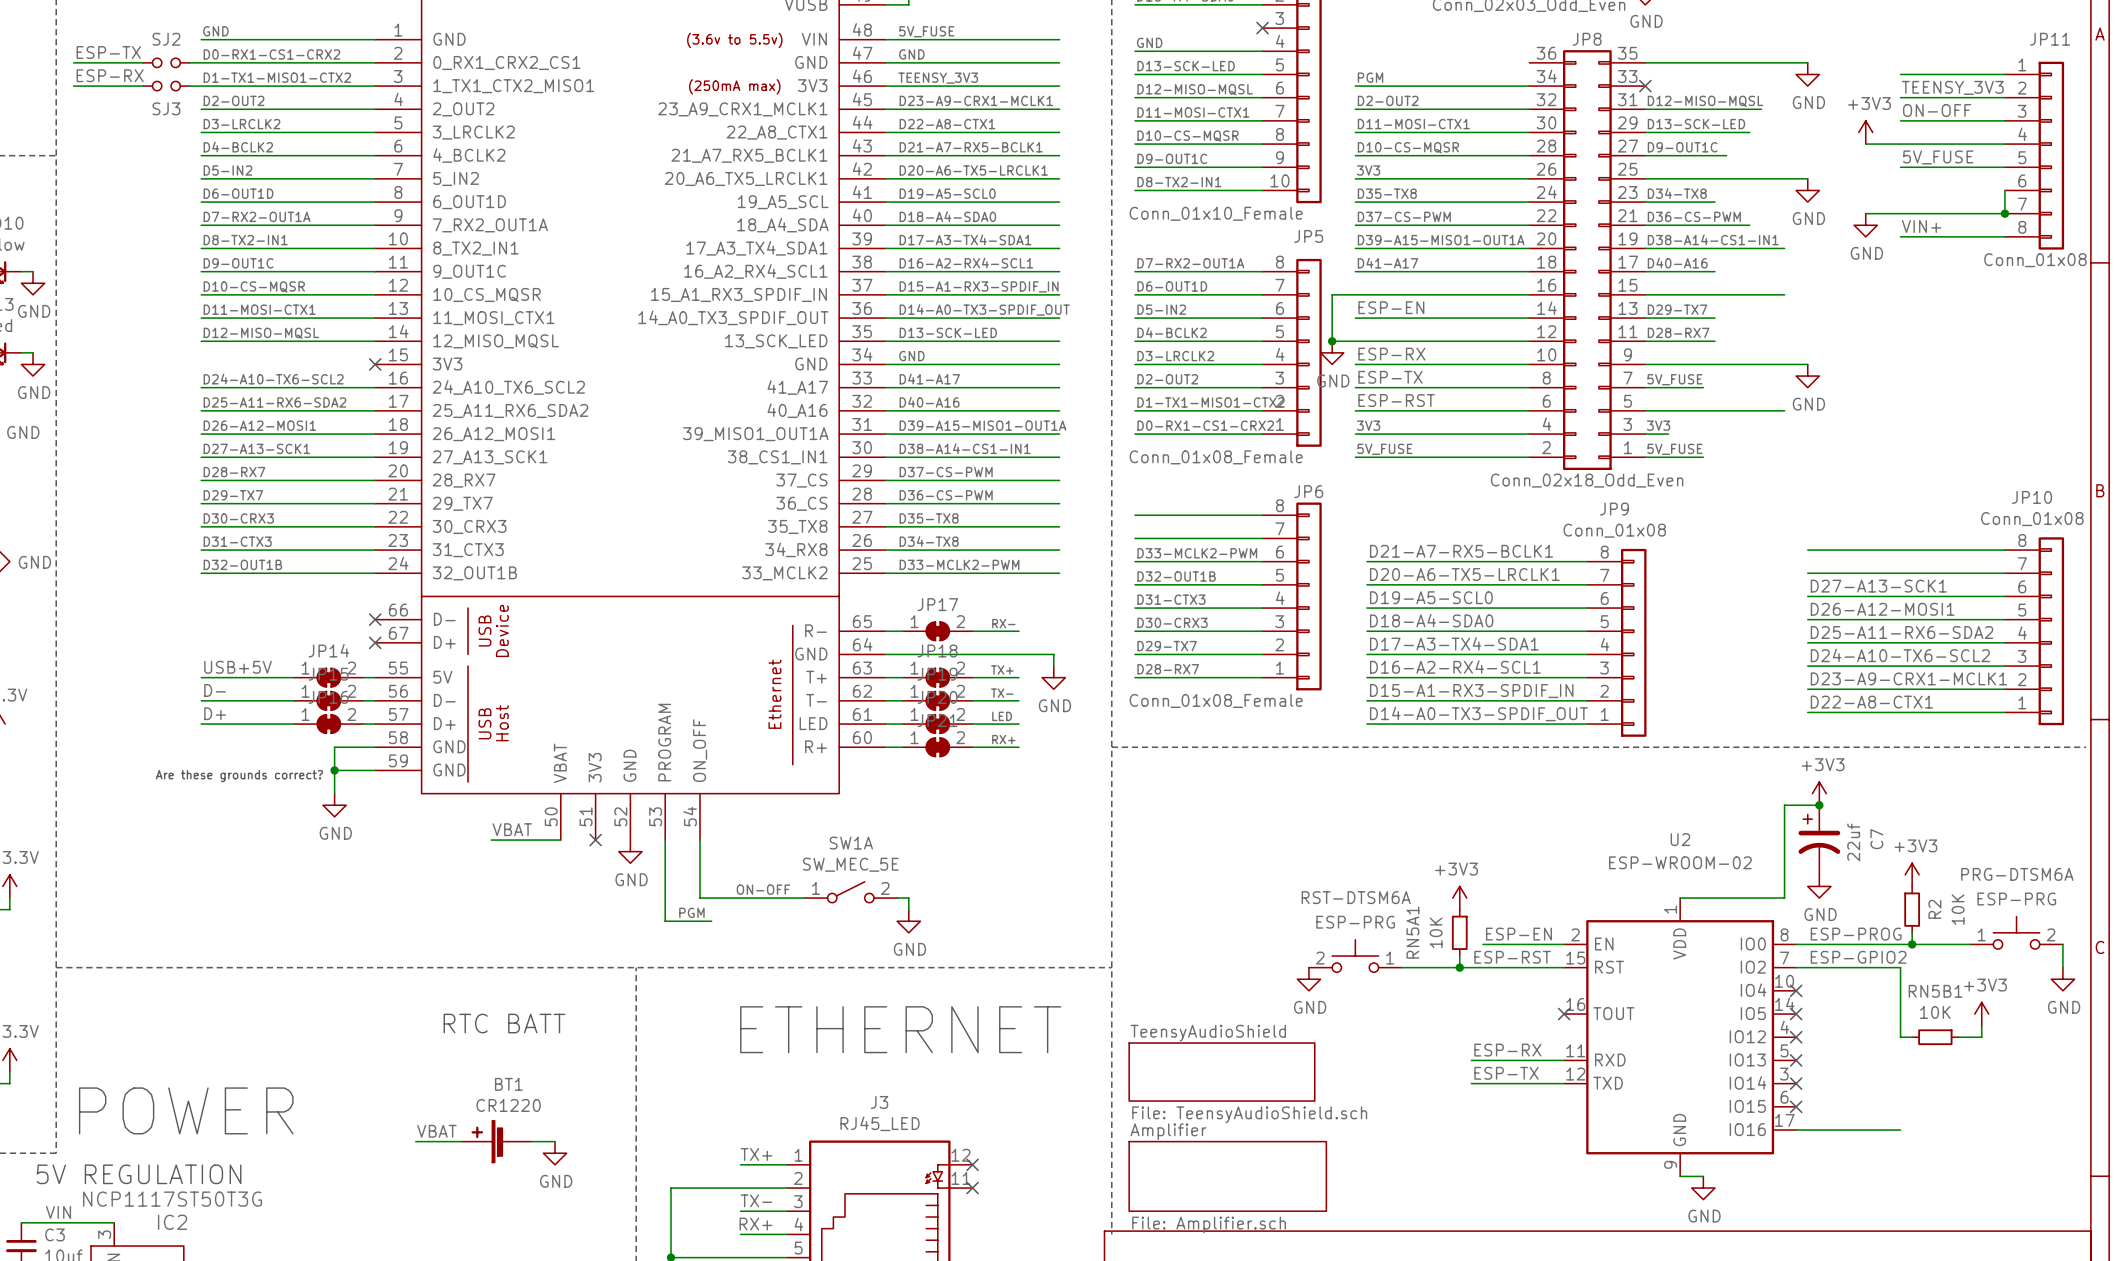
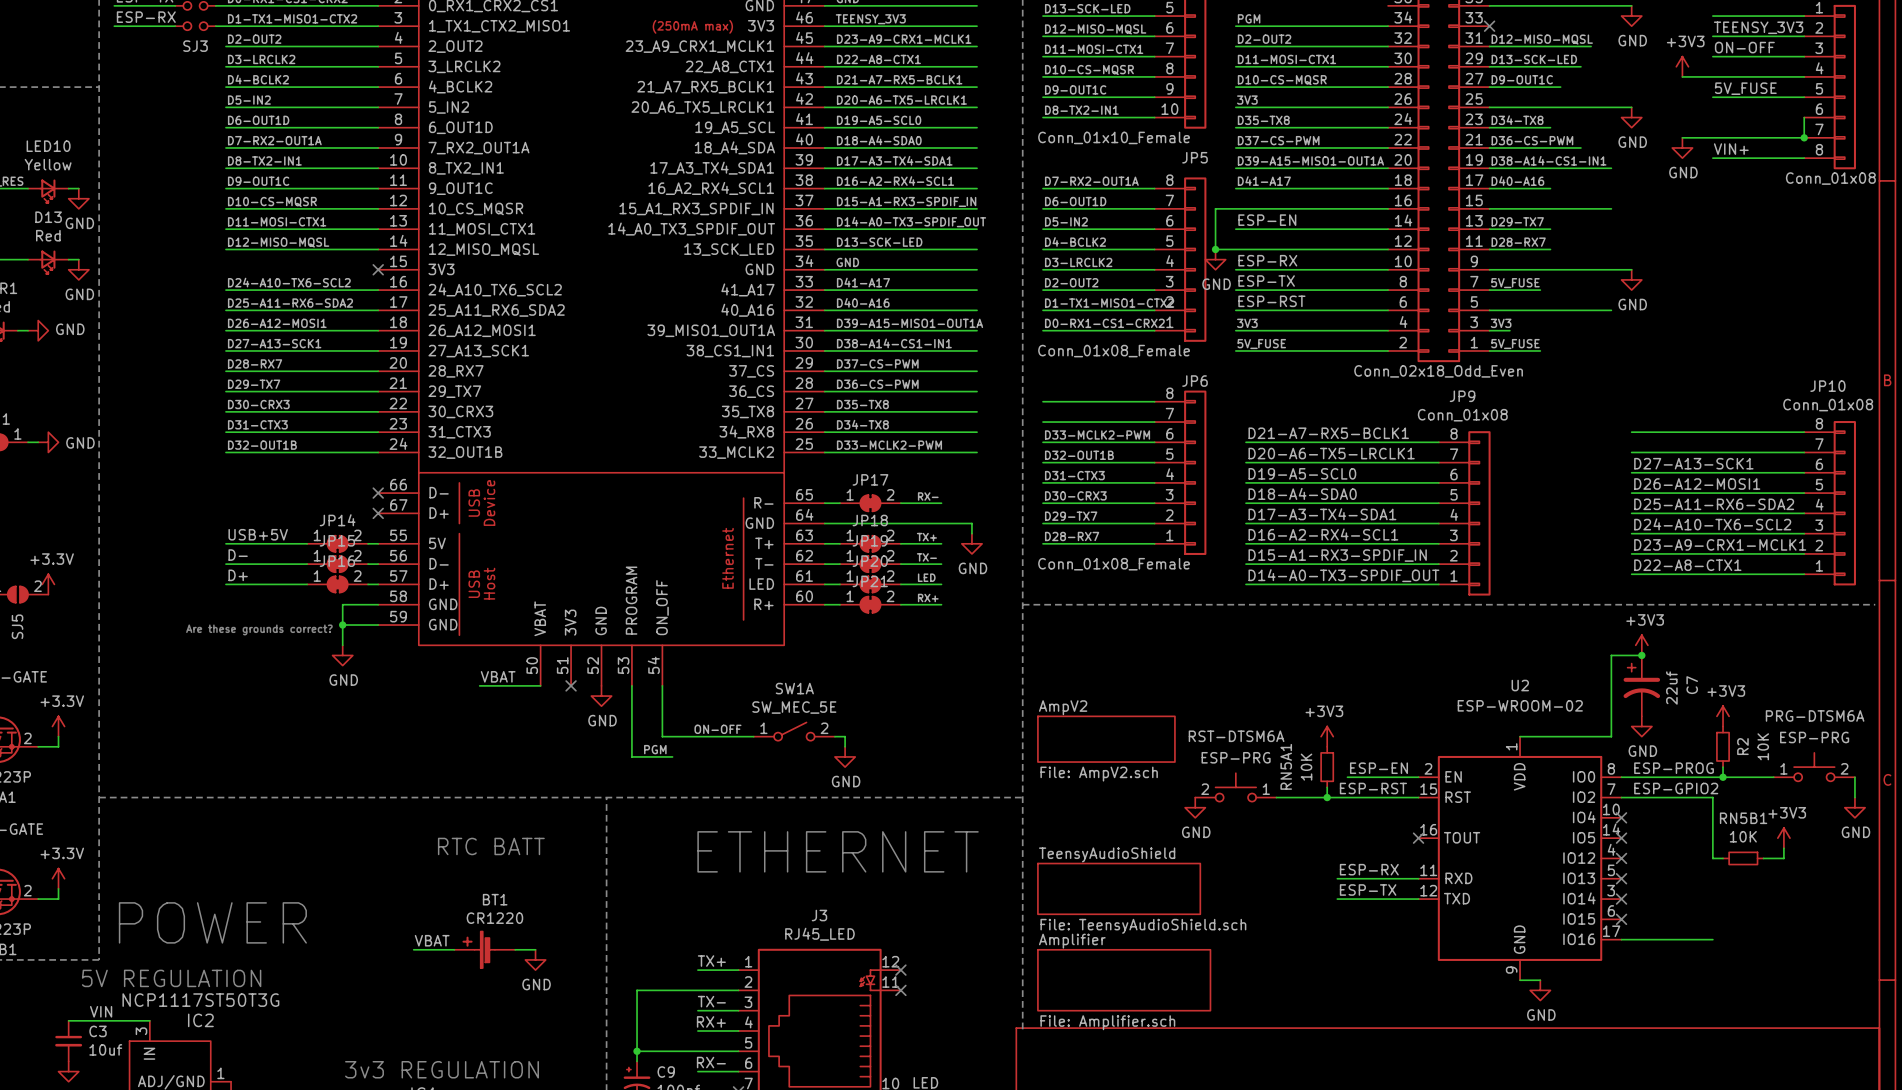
sheet AmpV2: none -> File: AmpV2.sch (1106, 739)

